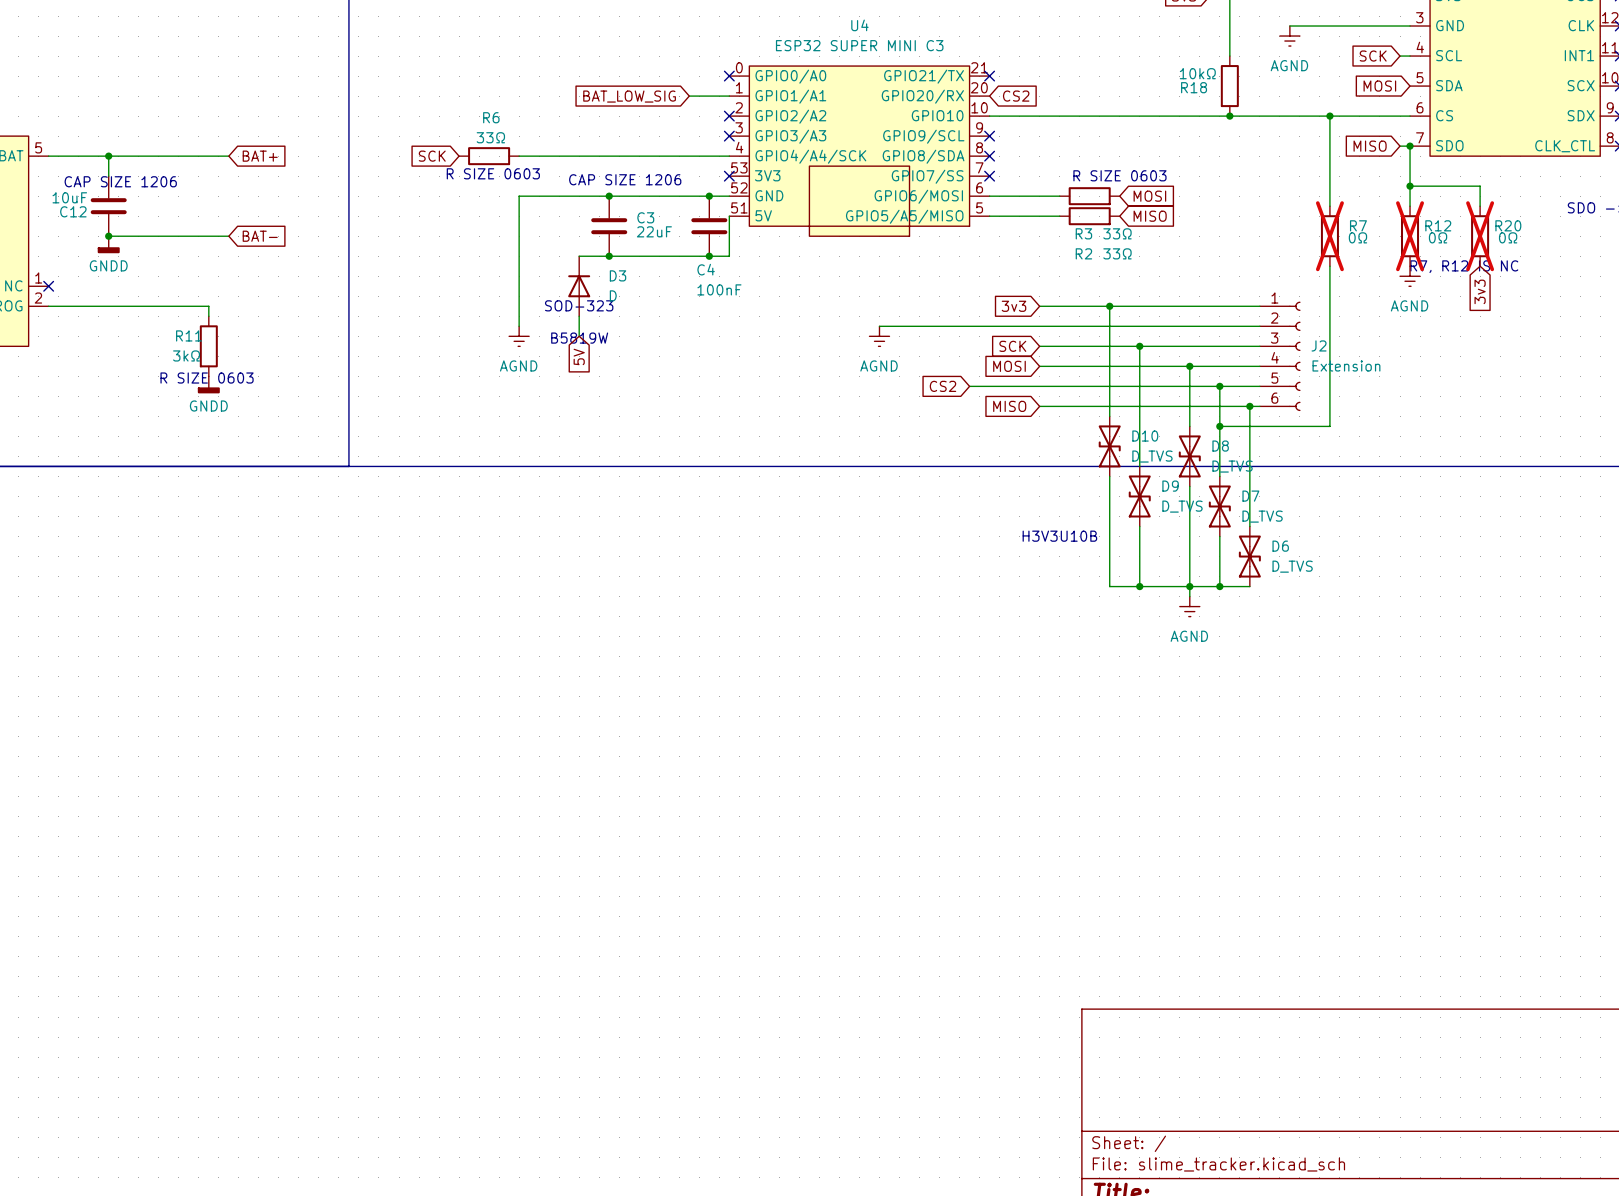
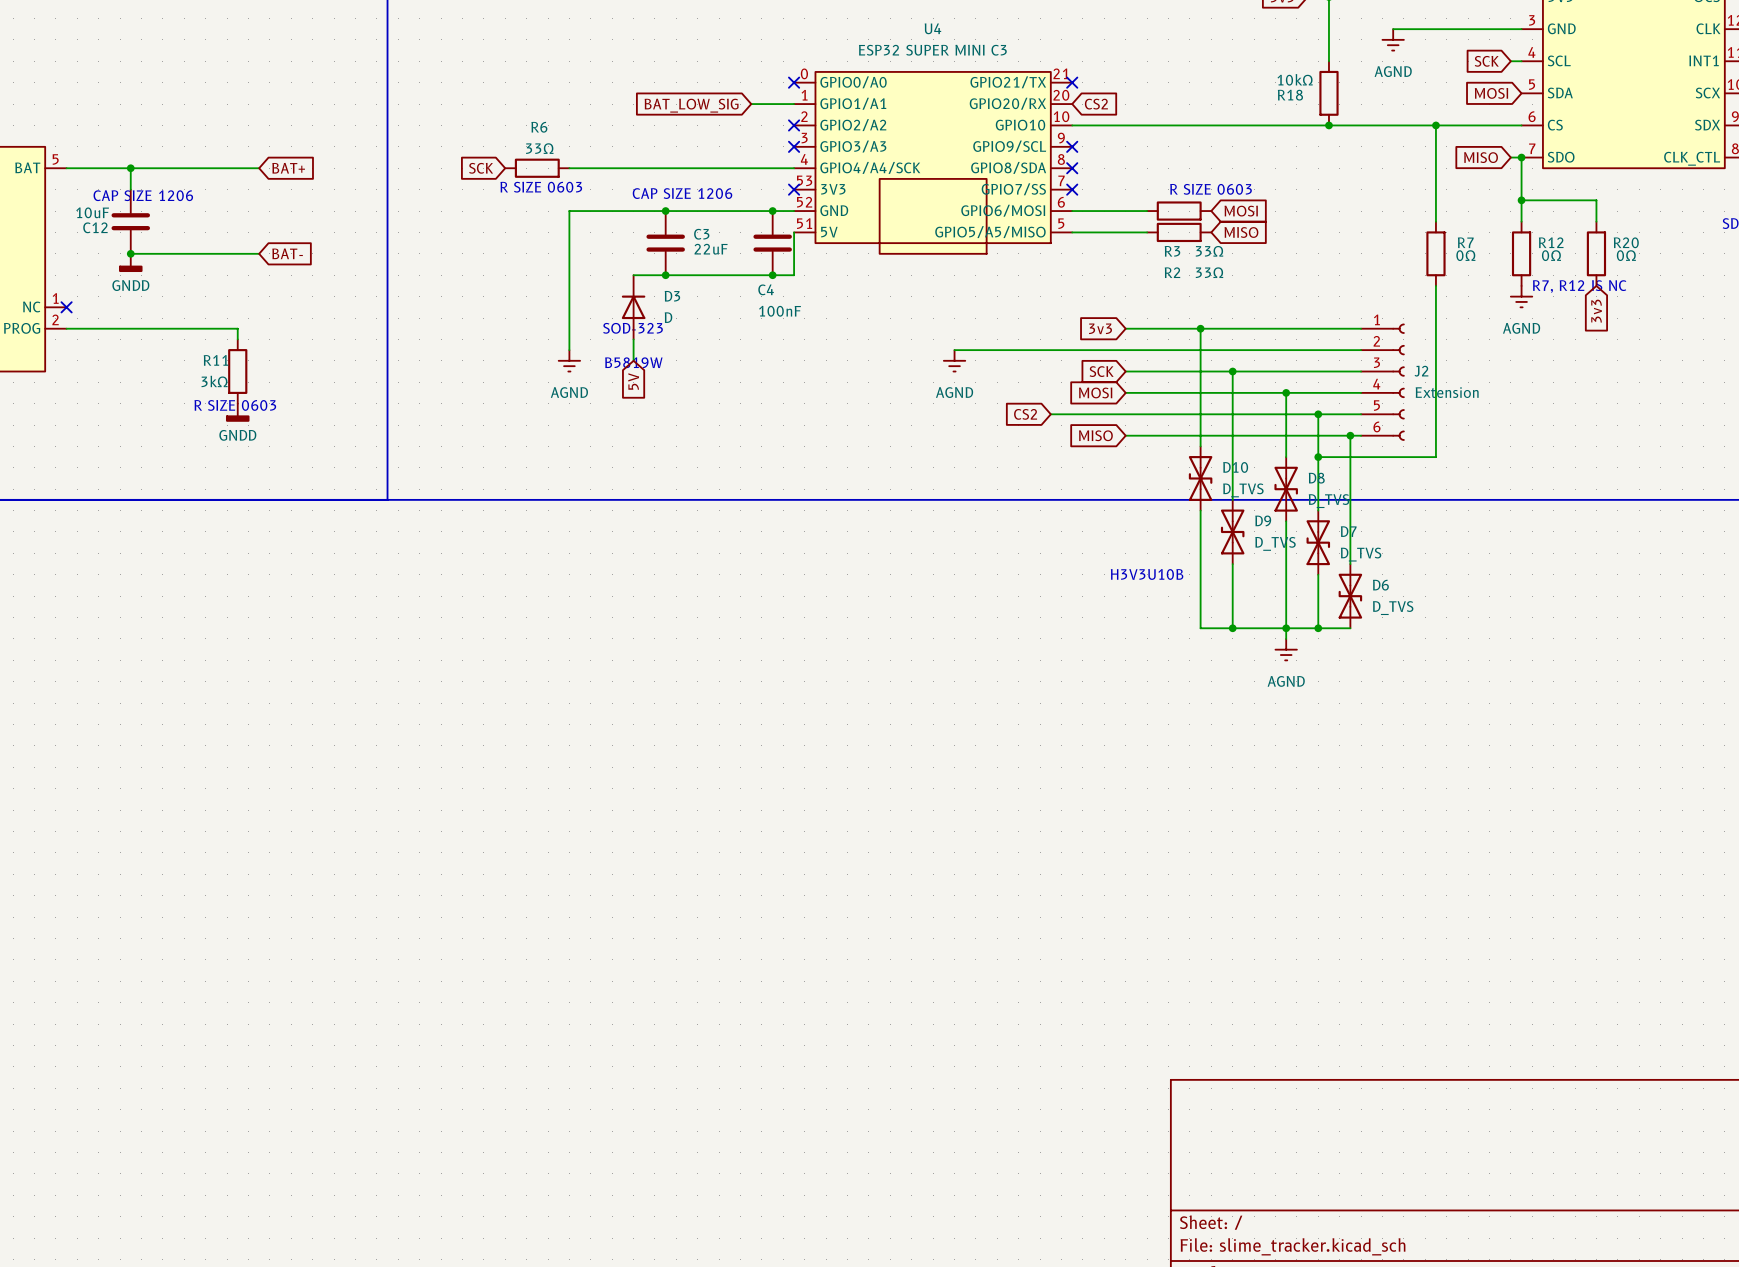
R7 do-not-place cross: (1329, 236) -> none
R12 do-not-place cross: (1410, 236) -> none
R20 do-not-place cross: (1480, 236) -> none

